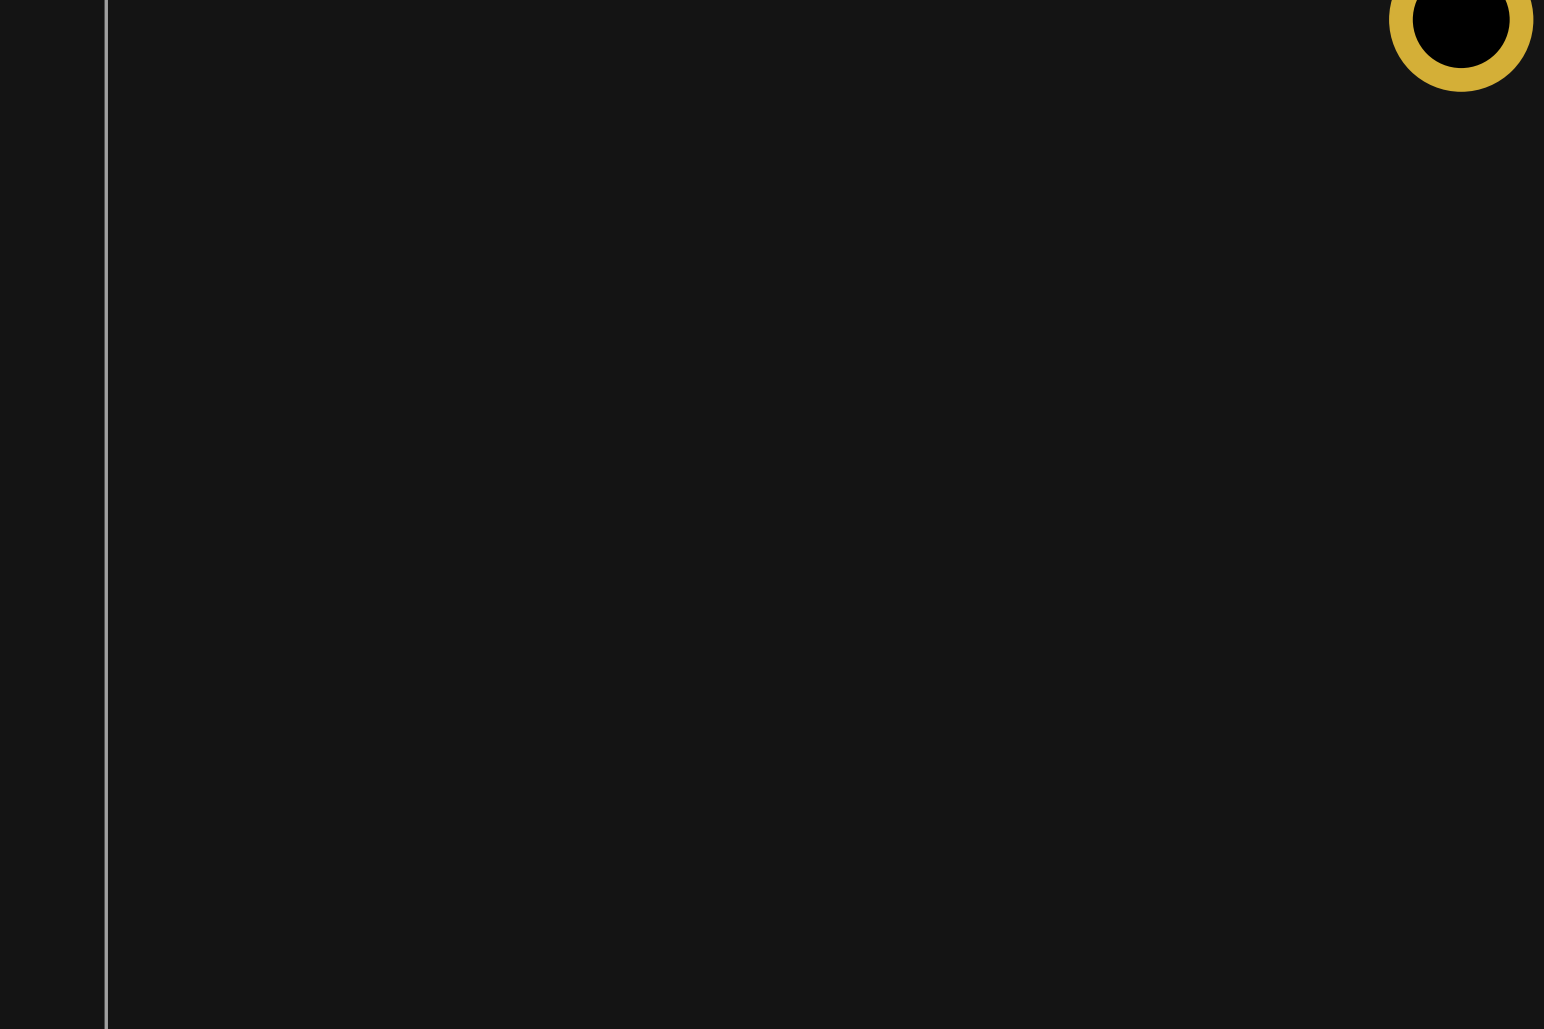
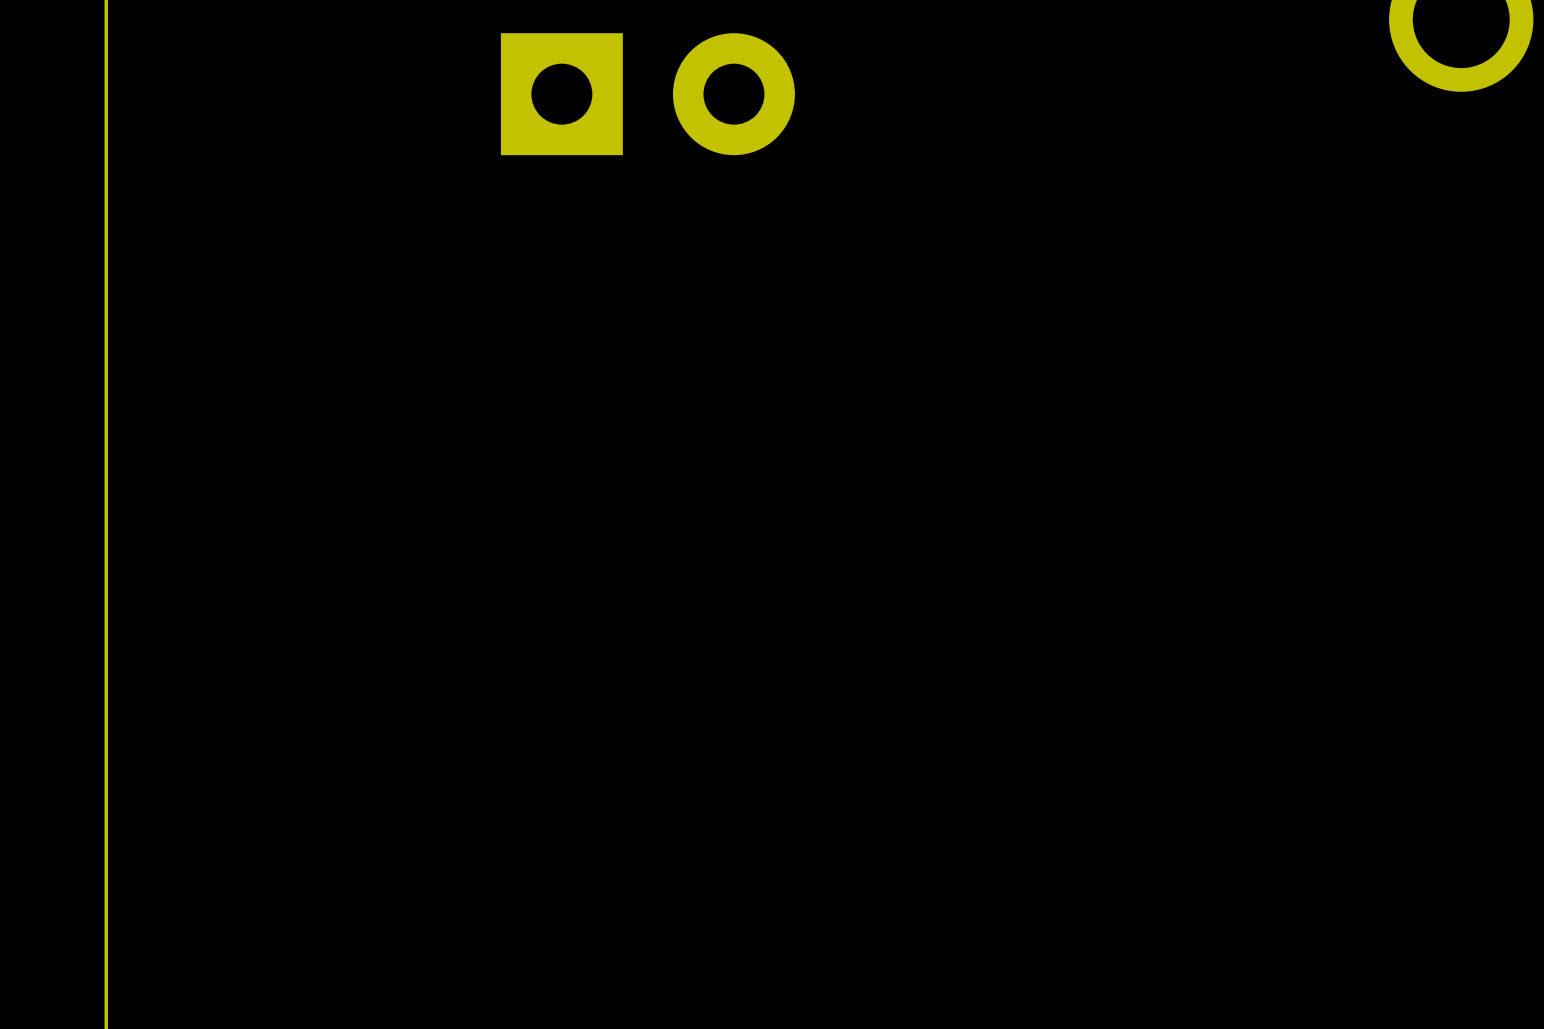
part: none -> (647, 94)

